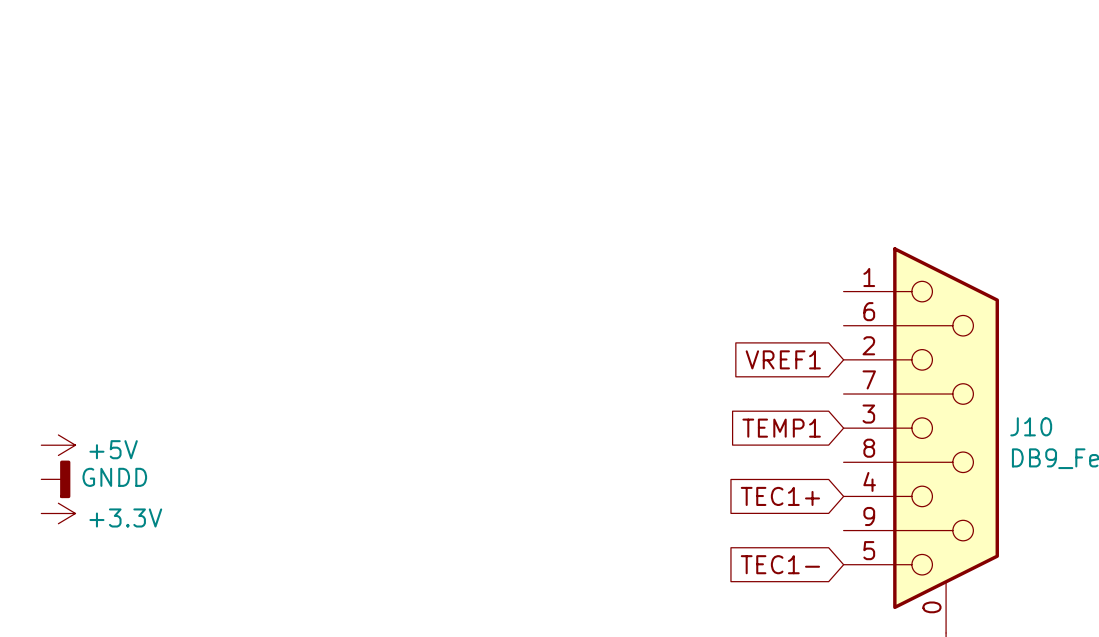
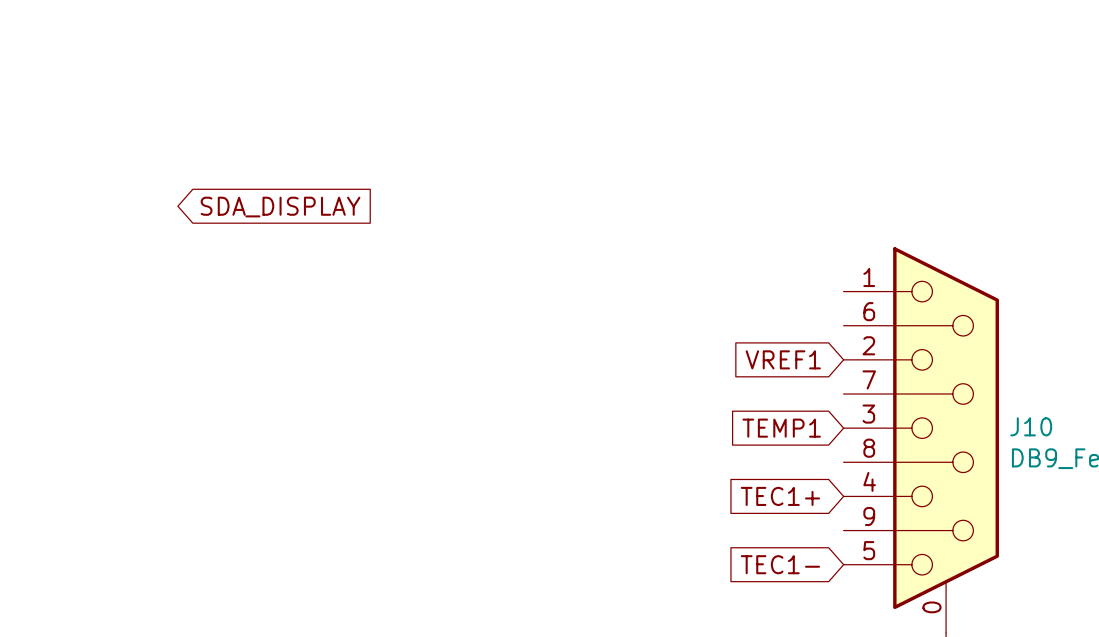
global label: none -> SDA_DISPLAY (280, 207)
power symbol: +5V (58, 445) -> none
power symbol: GNDD (55, 479) -> none
power symbol: +3.3V (58, 513) -> none

